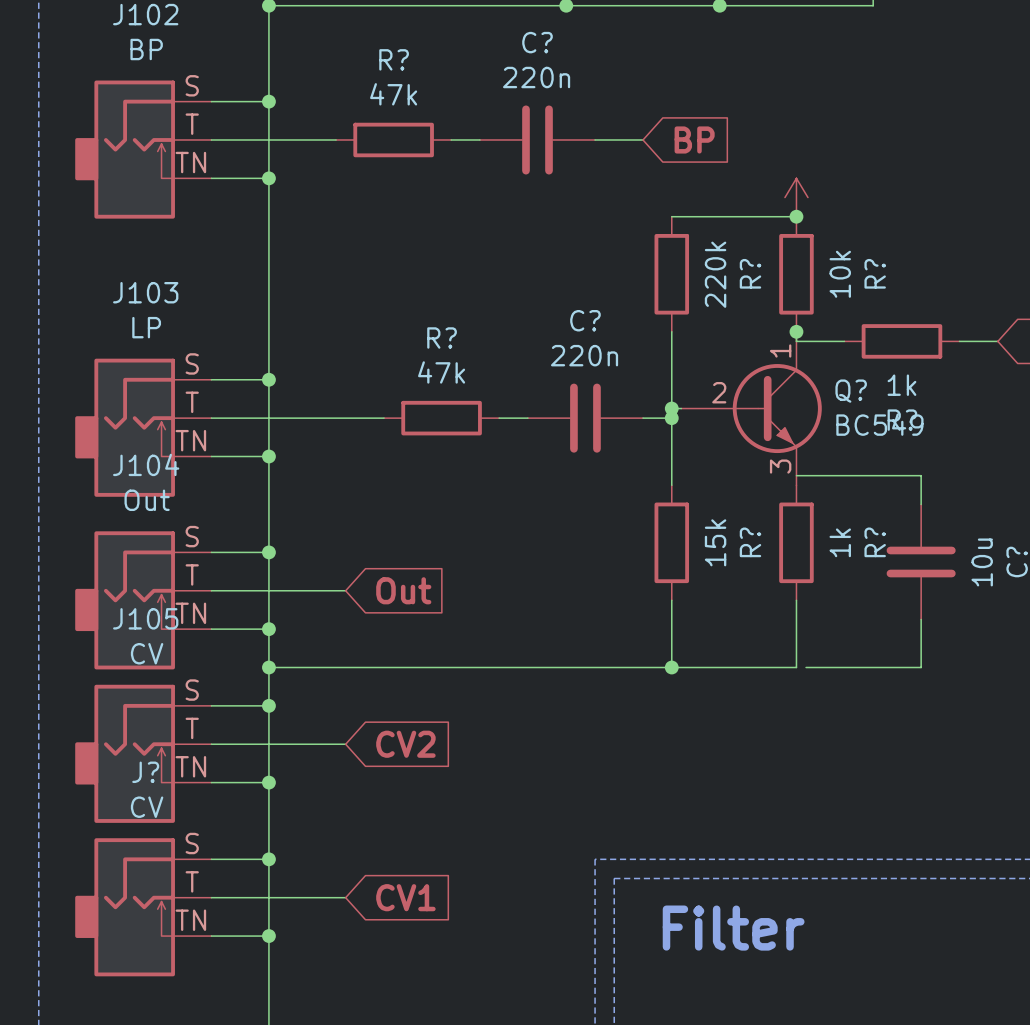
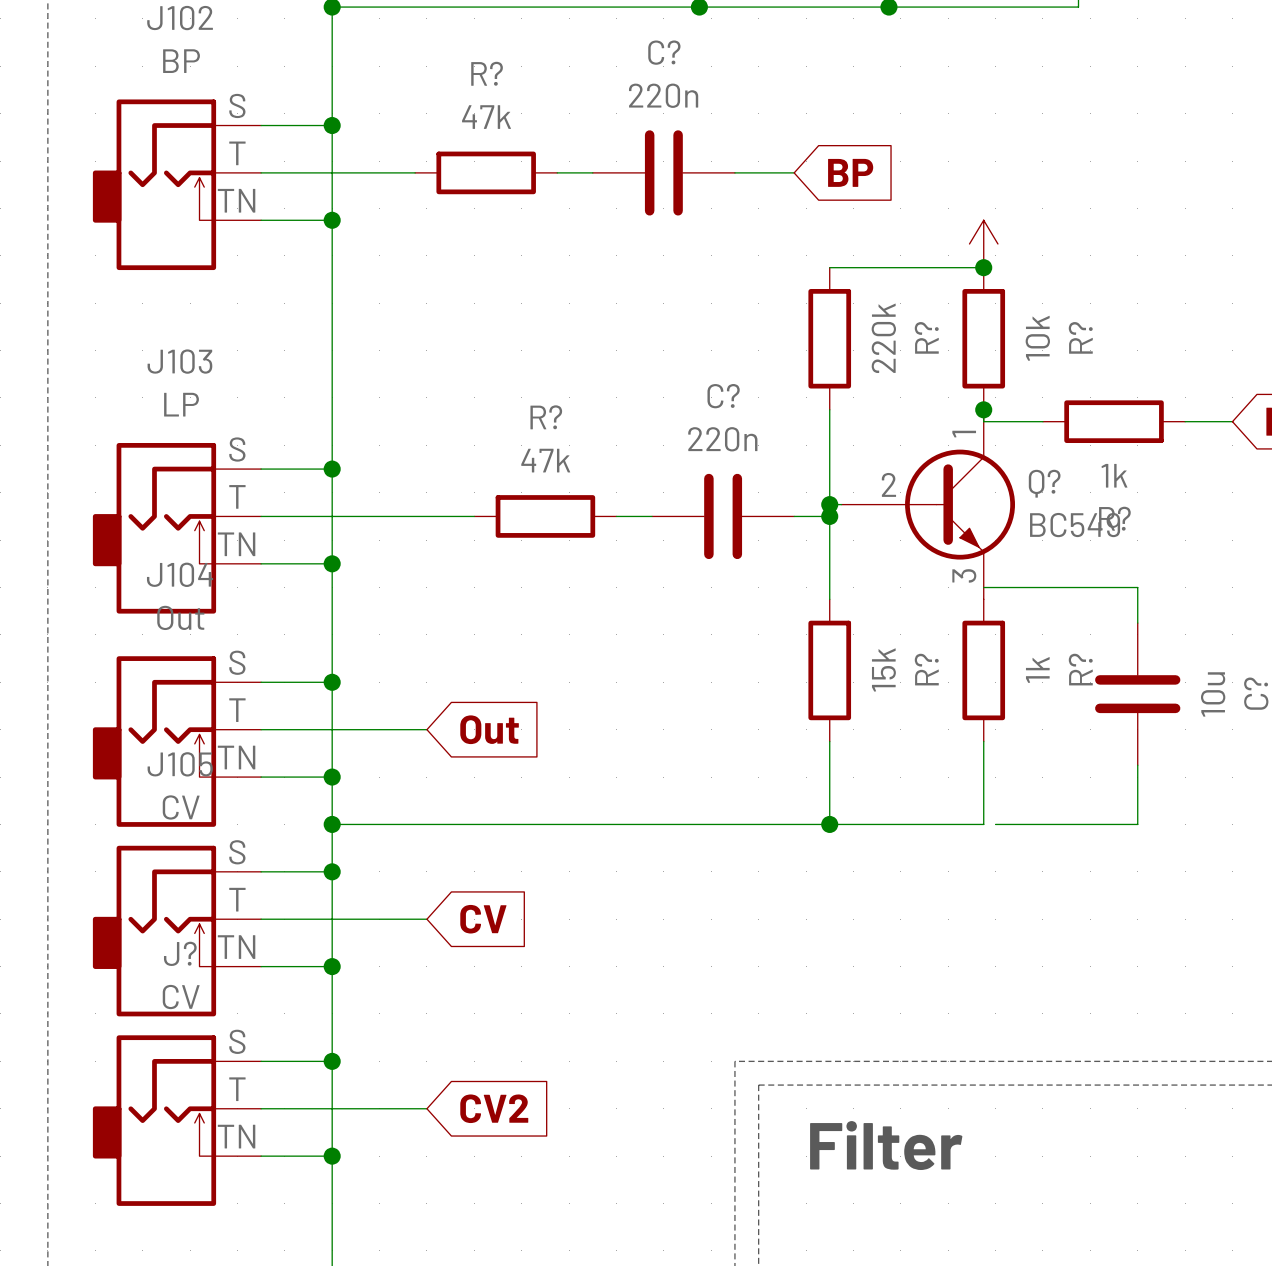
global label: CV2 (405, 744) -> CV (483, 919)
global label: CV1 (405, 897) -> CV2 (494, 1108)

